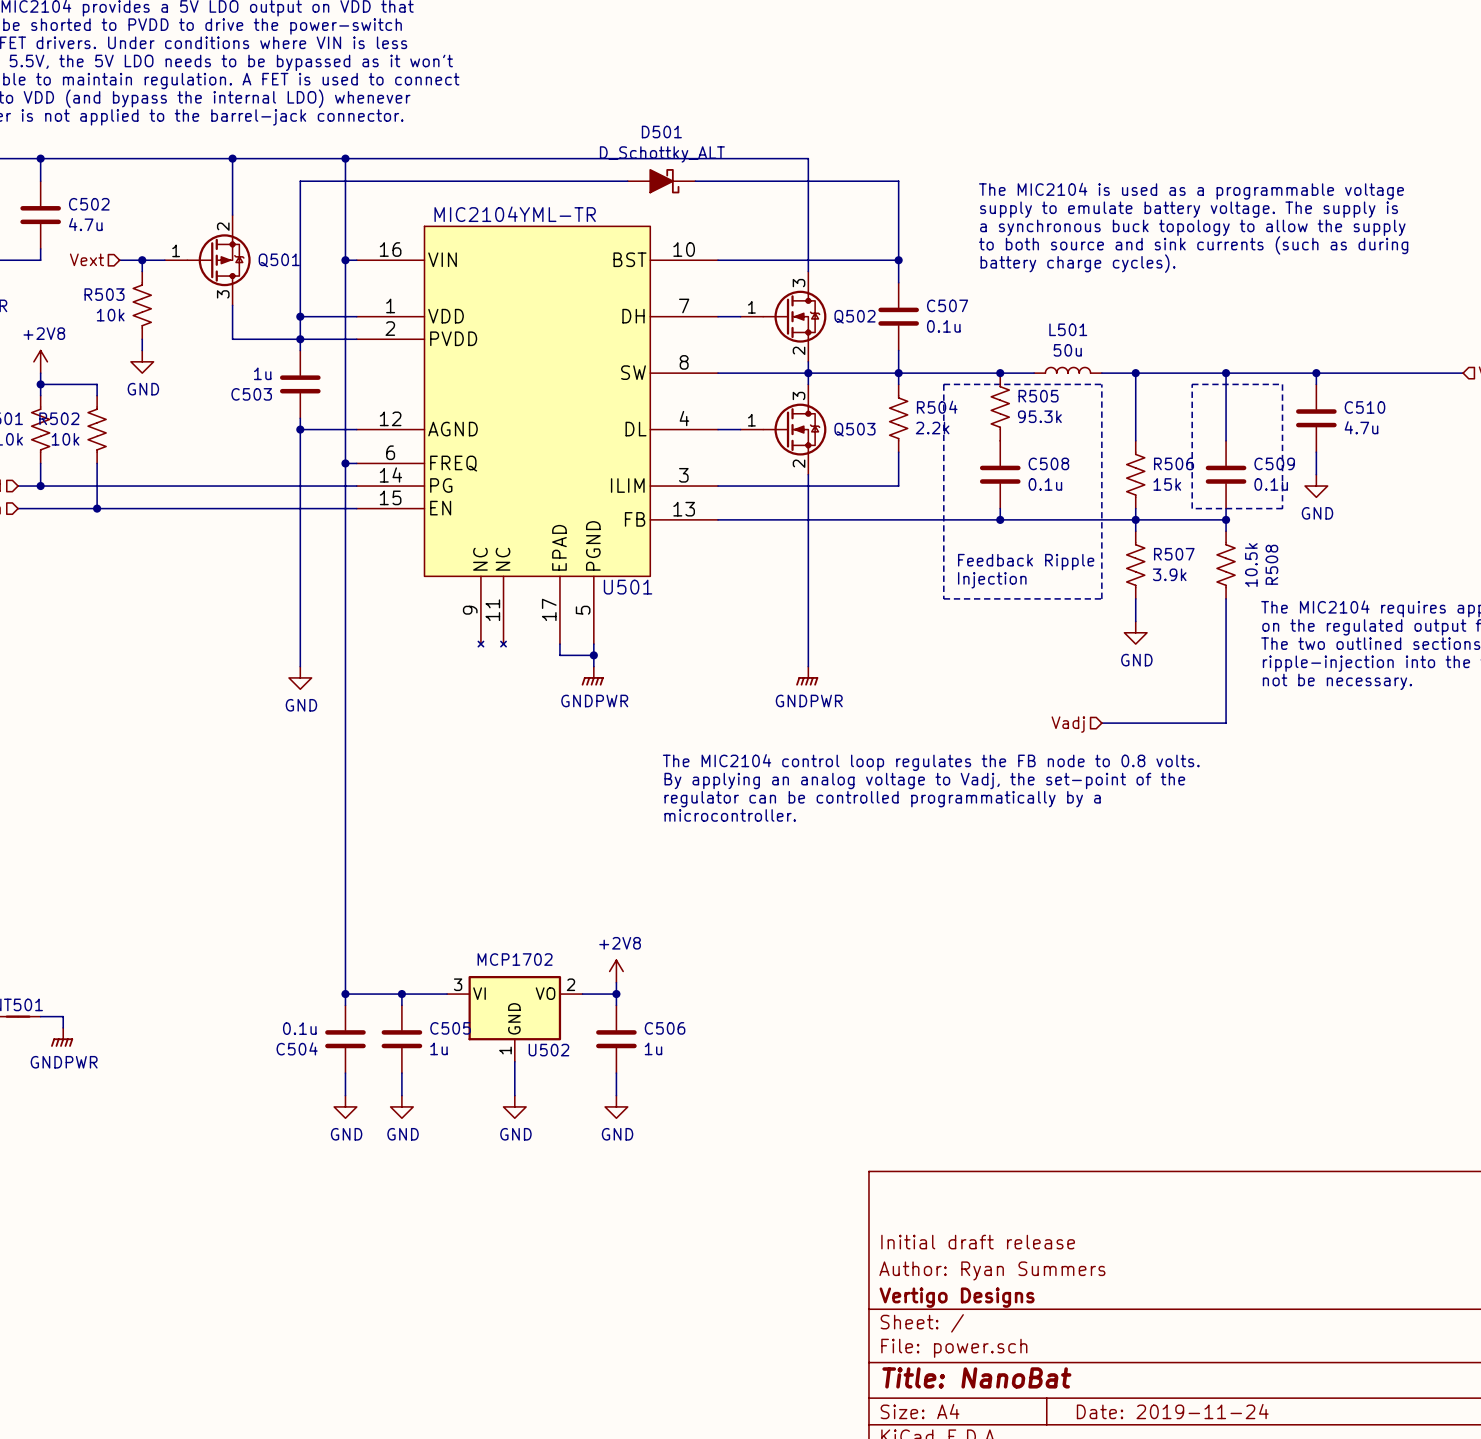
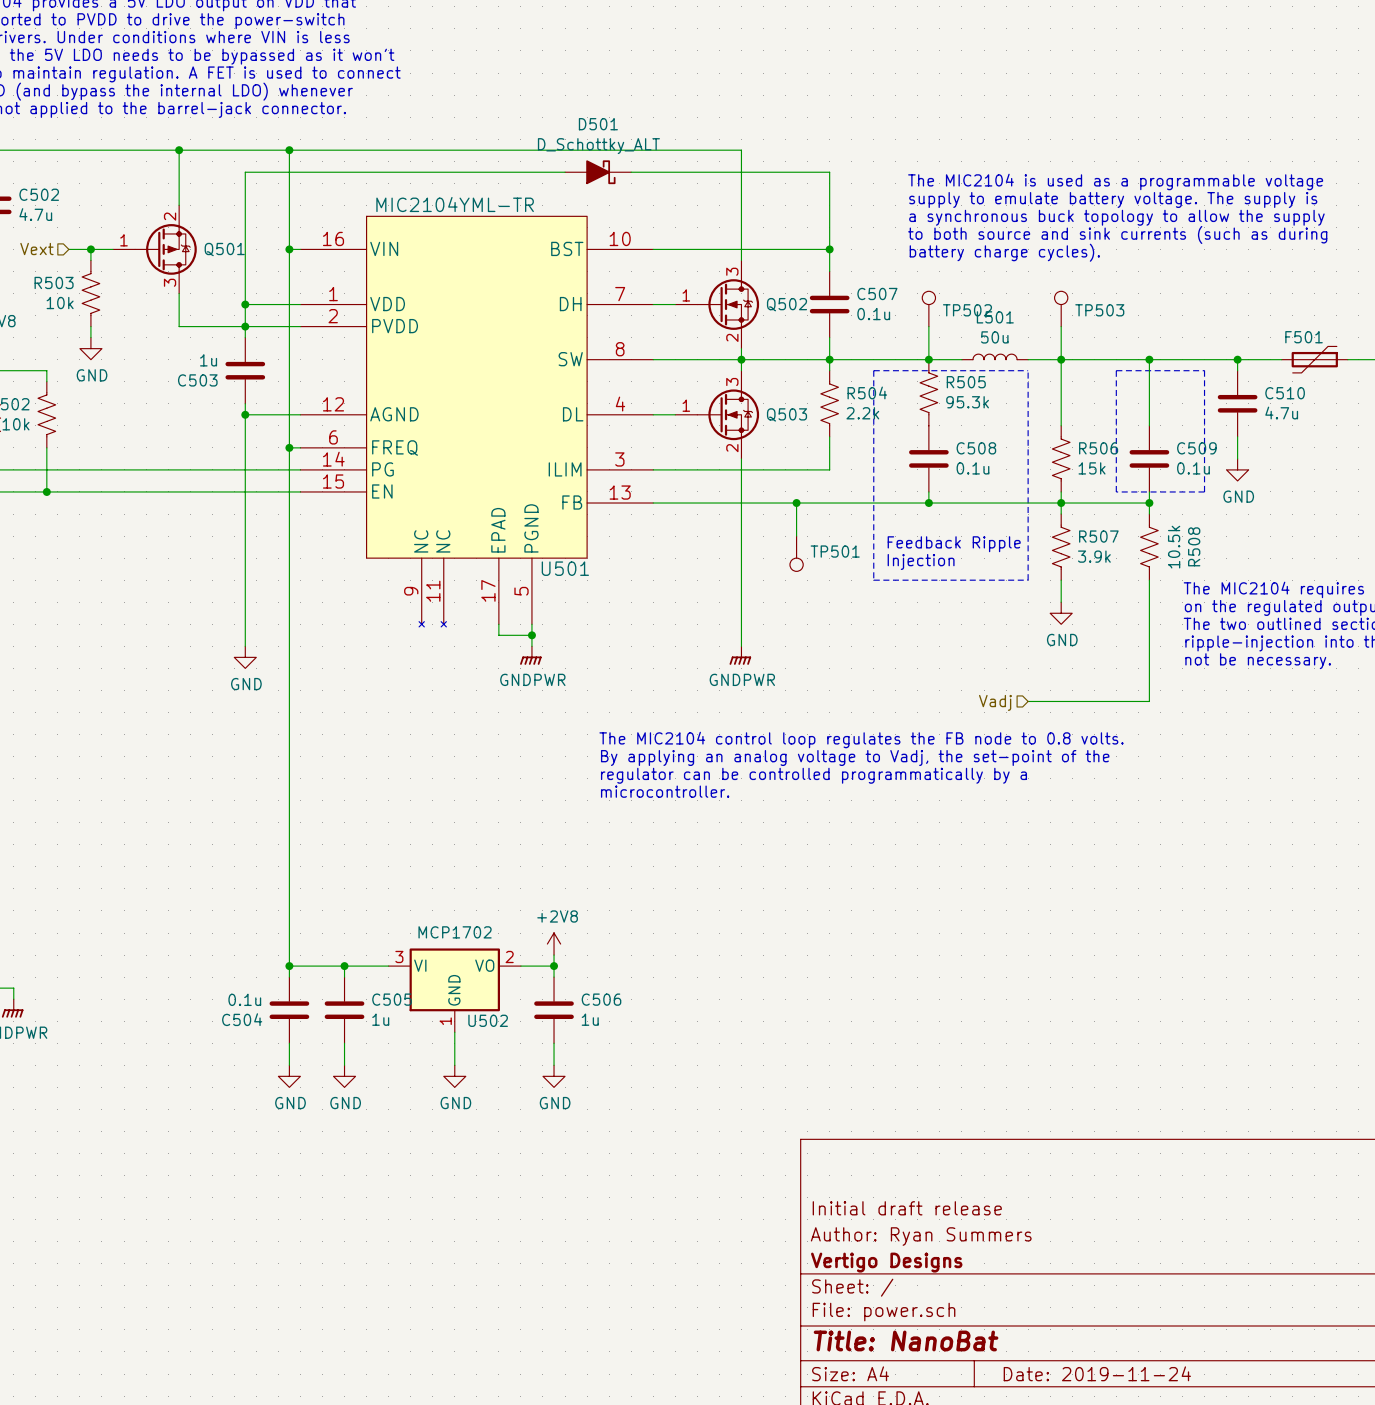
TP502: none -> (928, 308)
TP503: none -> (1061, 308)
wire: none -> (928, 326) (928, 359)
wire: none -> (1061, 326) (1061, 359)
F501: none -> (1314, 359)
wire: none -> (796, 503) (796, 536)
junction: none -> (796, 503)
TP501: none -> (796, 553)

